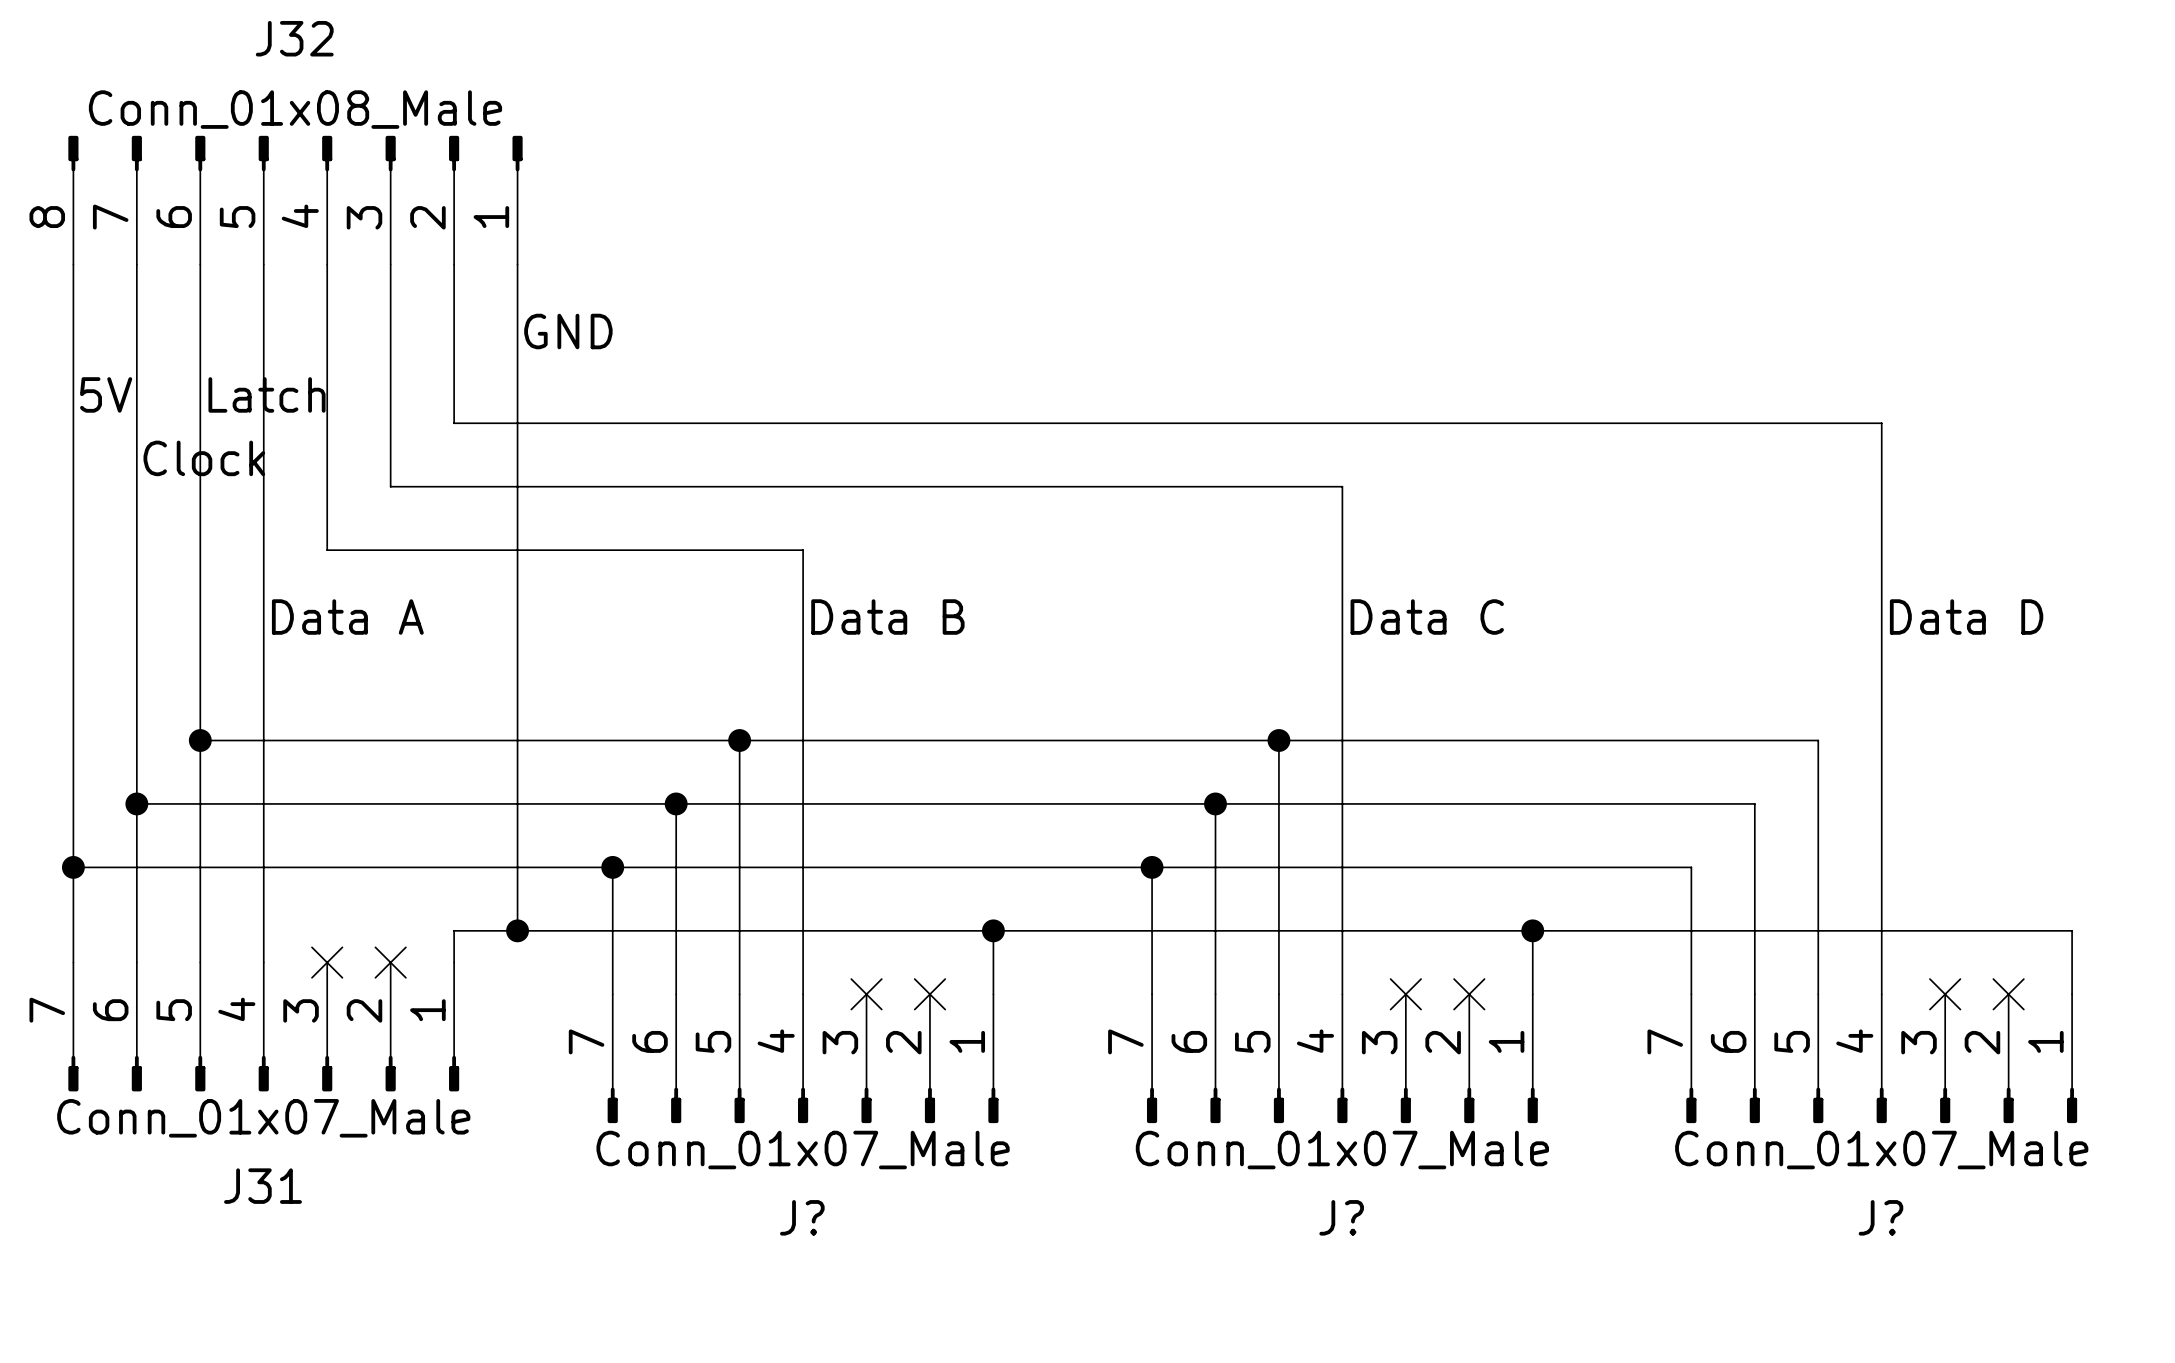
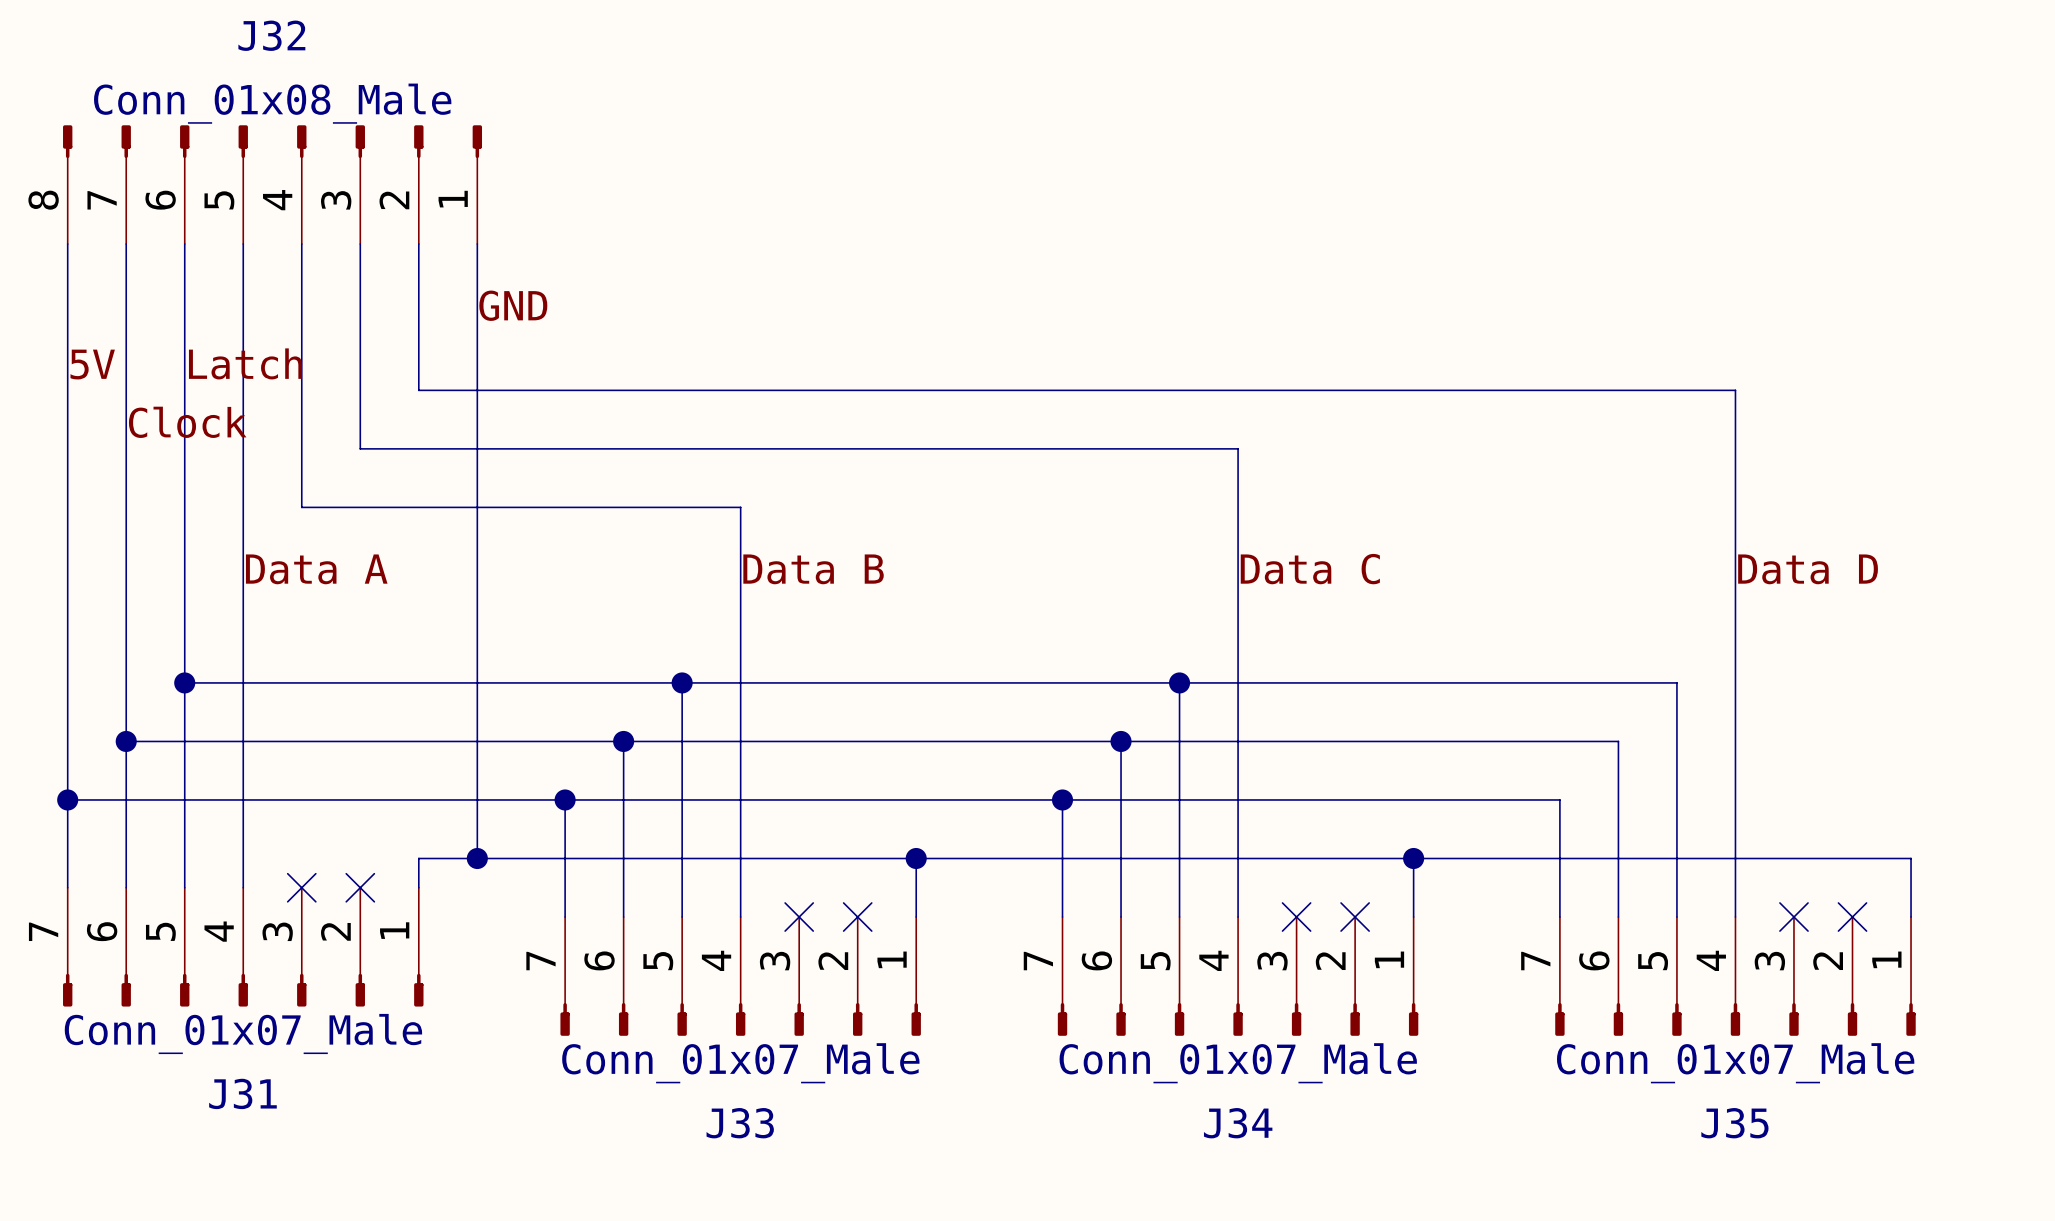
J? name: J? (802, 1217) -> J33 (740, 1123)
J? name: J? (1341, 1217) -> J34 (1238, 1123)
J? name: J? (1880, 1217) -> J35 (1734, 1123)

